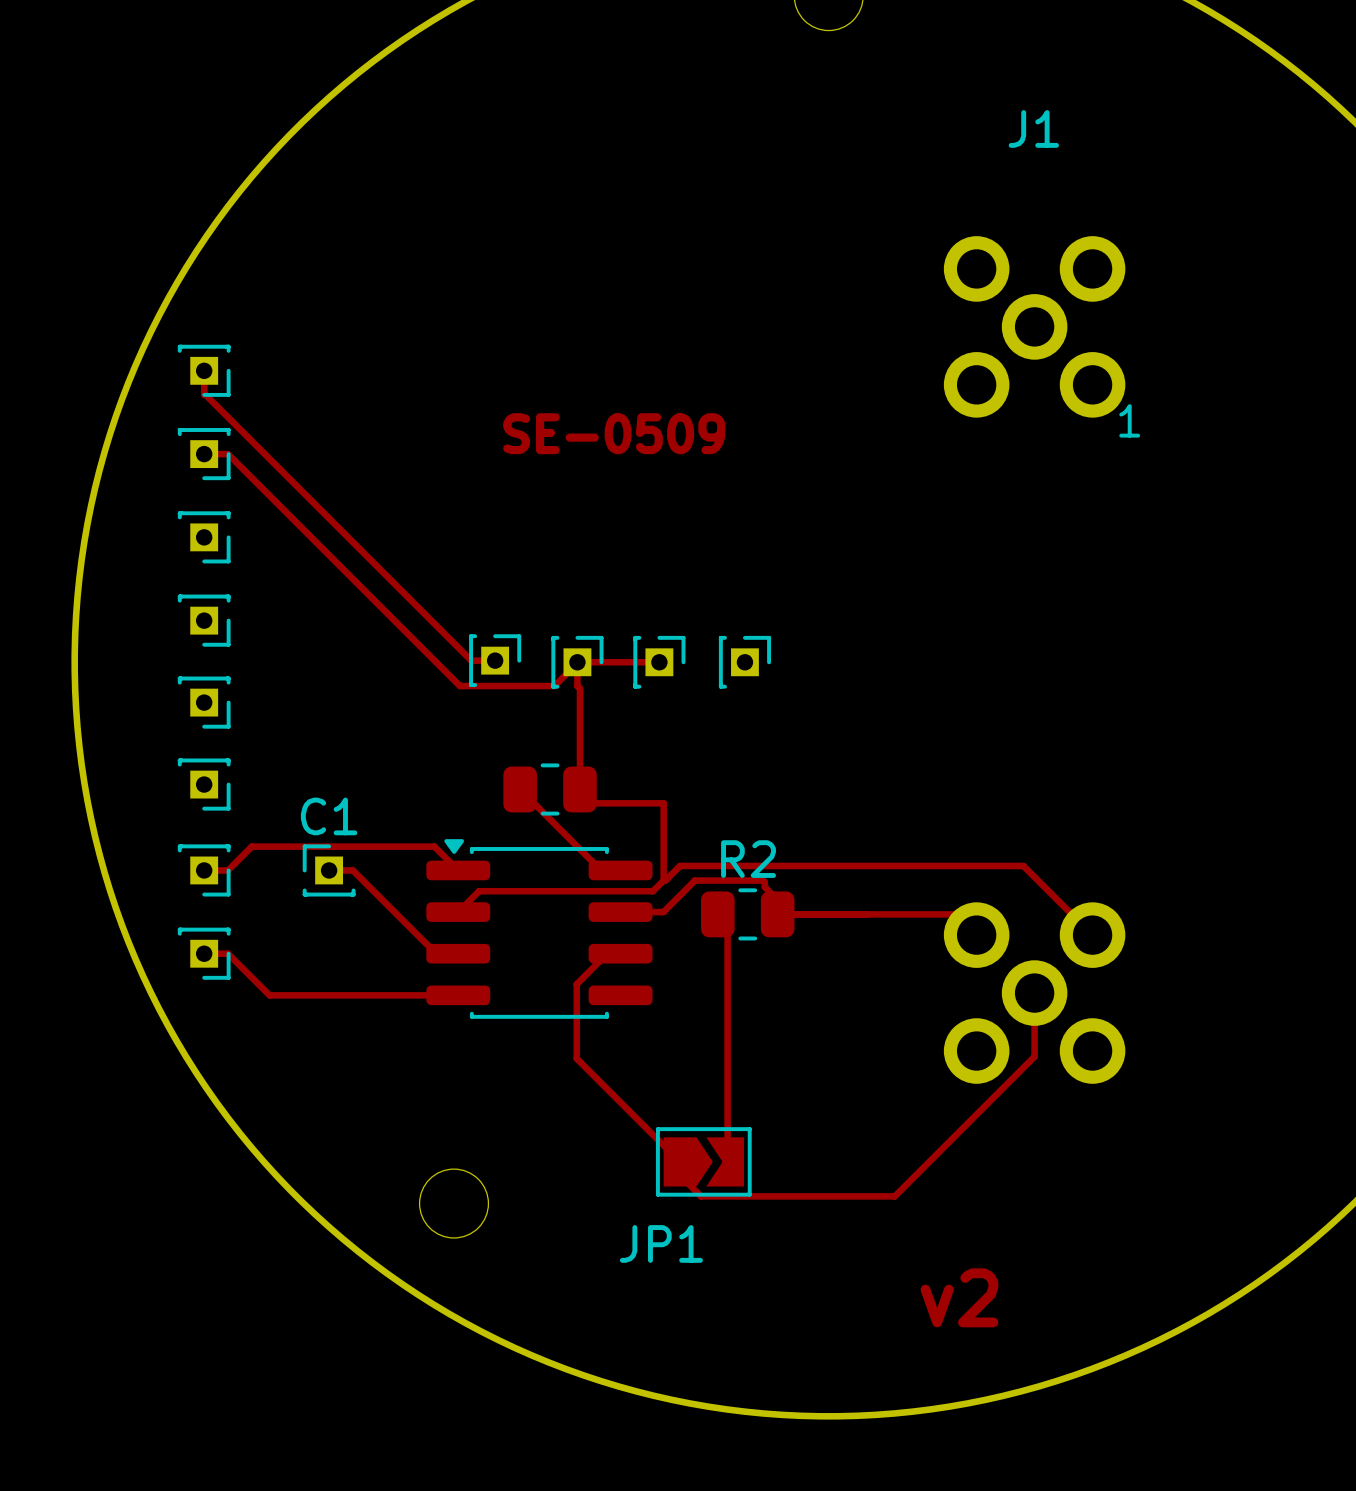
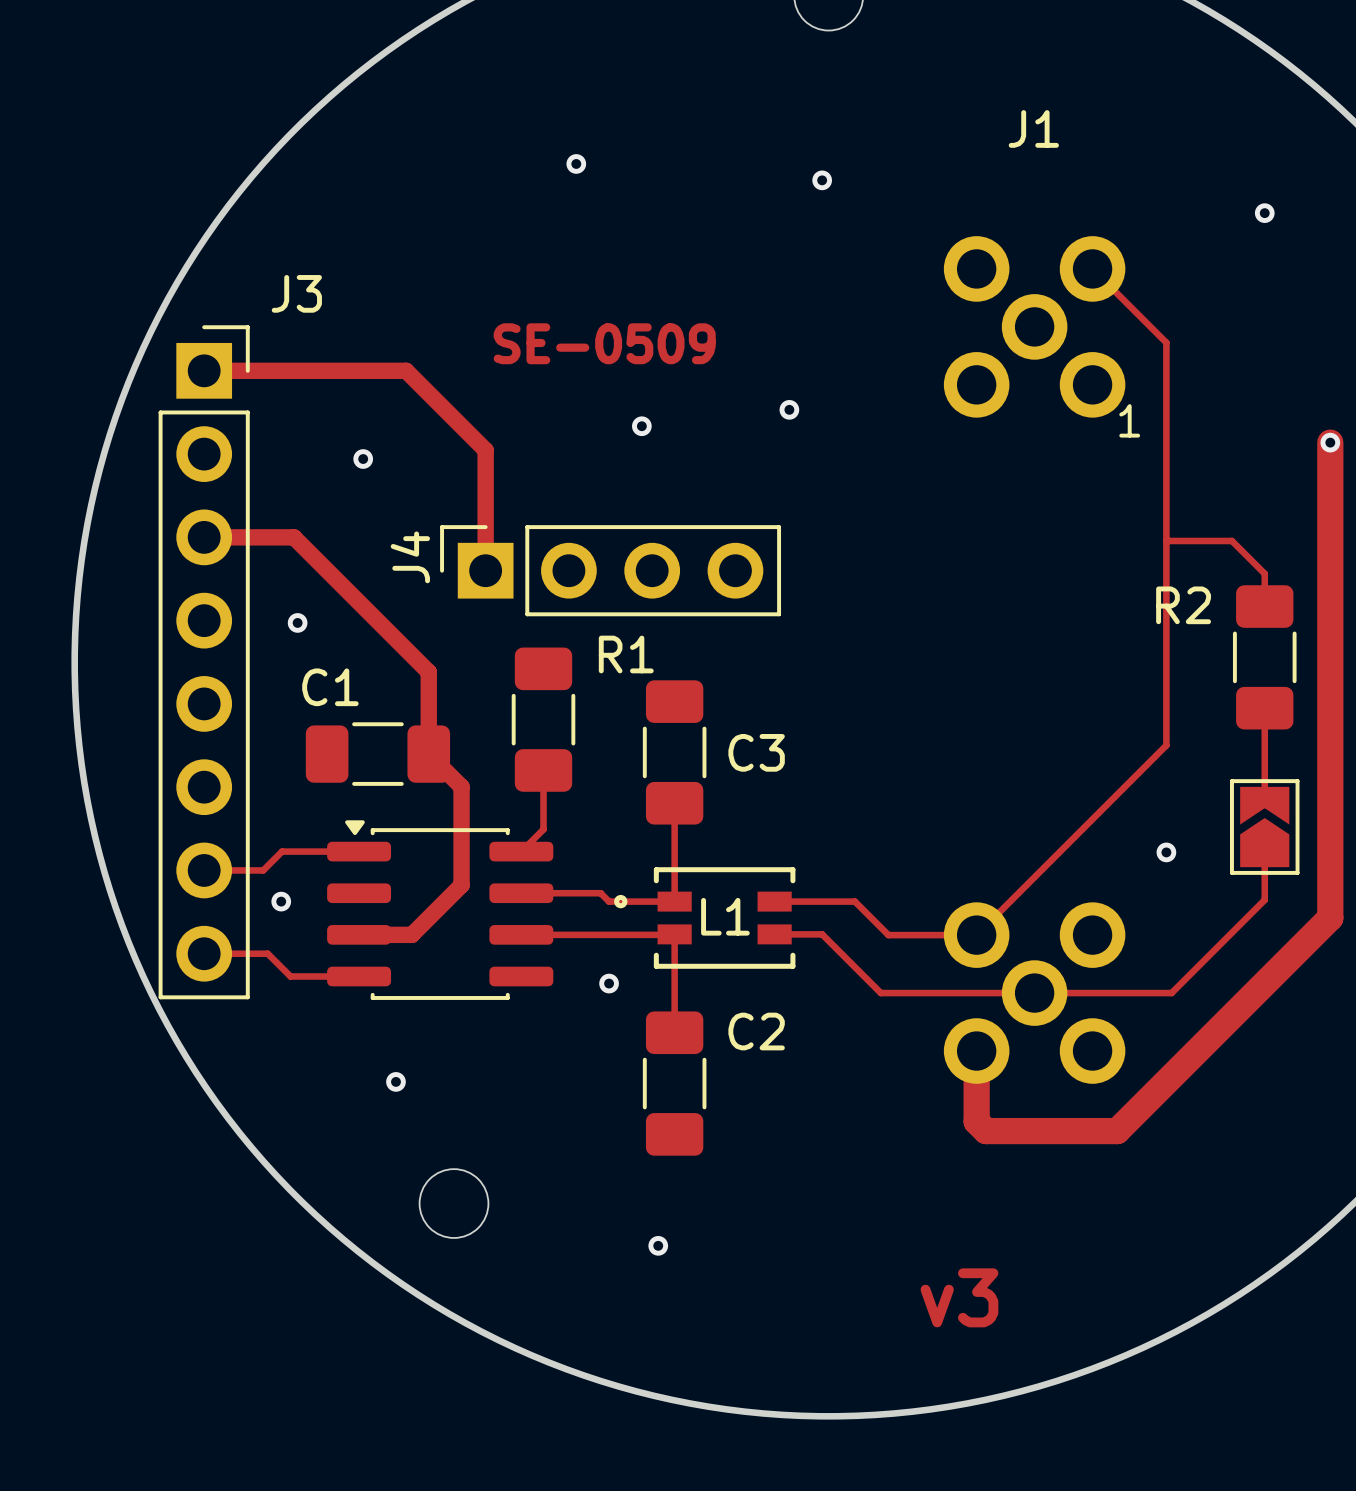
via: none -> (576, 163)
via: none -> (822, 180)
via: none -> (1264, 213)
track: none -> (1092, 268) (1166, 342) (1166, 745) (976, 935) (888, 935) (854, 901) (774, 901)
track: (204, 370) (204, 394) (471, 660) (495, 660) -> (204, 370) (406, 370) (485, 450) (485, 570)
part: (204, 370) -> none
via: none -> (789, 409)
via: none -> (641, 426)
text position: SE-0509 (614, 433) -> SE-0509 (604, 343)
track: none -> (1330, 442) (1330, 917) (1117, 1131) (986, 1131) (976, 1121) (976, 1051)
via: none -> (1330, 442)
track: (204, 454) (228, 454) (459, 686) (554, 686) (577, 663) -> none
part: (204, 454) -> none
via: none -> (363, 459)
track: none -> (204, 537) (294, 537) (428, 672) (428, 754) (461, 786) (461, 885) (411, 934) (359, 934)
part: (204, 537) -> none
track: none -> (1166, 540) (1231, 540) (1264, 573) (1264, 606)
J4: none -> (610, 570)
part: (204, 620) -> none
via: none -> (297, 622)
part: (495, 660) -> none
J3: none -> (204, 662)
part: (577, 662) -> none
track: (659, 662) (577, 662) (577, 686) (579, 688) (579, 803) (663, 803) (663, 880) -> none
part: (659, 662) -> none
part: (744, 662) -> none
part: (204, 702) -> none
track: none -> (1264, 708) (1264, 803)
R1: none -> (543, 719)
C3: none -> (674, 752)
track: none -> (543, 770) (543, 829) (521, 851)
part: (204, 784) -> none
track: (520, 789) (601, 870) (620, 870) -> none
part: (550, 789) -> none
track: none -> (674, 803) (674, 901) (609, 901) (600, 893) (521, 893)
part: none -> (1264, 827)
C1 footprint: [302, 844, 356, 897] -> [305, 722, 451, 786]
track: none -> (1264, 850) (1264, 899) (1171, 993) (880, 993) (822, 934) (774, 934)
via: none -> (1166, 852)
R2 name position: R2 (748, 859) -> R2 (1183, 605)
part: (204, 870) -> none
track: (228, 870) (251, 846) (434, 846) (458, 870) -> (228, 870) (263, 870) (282, 851) (359, 851)
track: (329, 870) (352, 870) (436, 953) (458, 953) -> none
track: (663, 880) (652, 891) (479, 891) (458, 912) -> none
track: (663, 880) (680, 865) (1023, 865) (1092, 935) -> none
R2 footprint: [701, 888, 795, 941] -> [1232, 585, 1297, 730]
via: none -> (281, 901)
track: (620, 912) (663, 912) (694, 880) (762, 880) (764, 887) (792, 914) -> none
track: (717, 914) (727, 924) (727, 1161) -> none
track: (777, 914) (955, 914) (976, 935) -> none
L1: none -> (704, 917)
part position: (539, 928) -> (440, 910)
track: none -> (521, 934) (674, 934) (674, 1032)
part: (204, 953) -> none
track: (228, 953) (269, 995) (458, 995) -> (228, 953) (267, 953) (290, 976) (359, 976)
track: (620, 953) (607, 953) (576, 984) (576, 1058) (680, 1161) (680, 1175) (700, 1196) (894, 1196) (1034, 1056) (1034, 993) -> none
via: none -> (609, 983)
via: none -> (395, 1081)
C2: none -> (674, 1083)
JP1: (703, 1161) -> none
via: none -> (658, 1245)
text: v2 (959, 1297) -> v3 (959, 1297)

